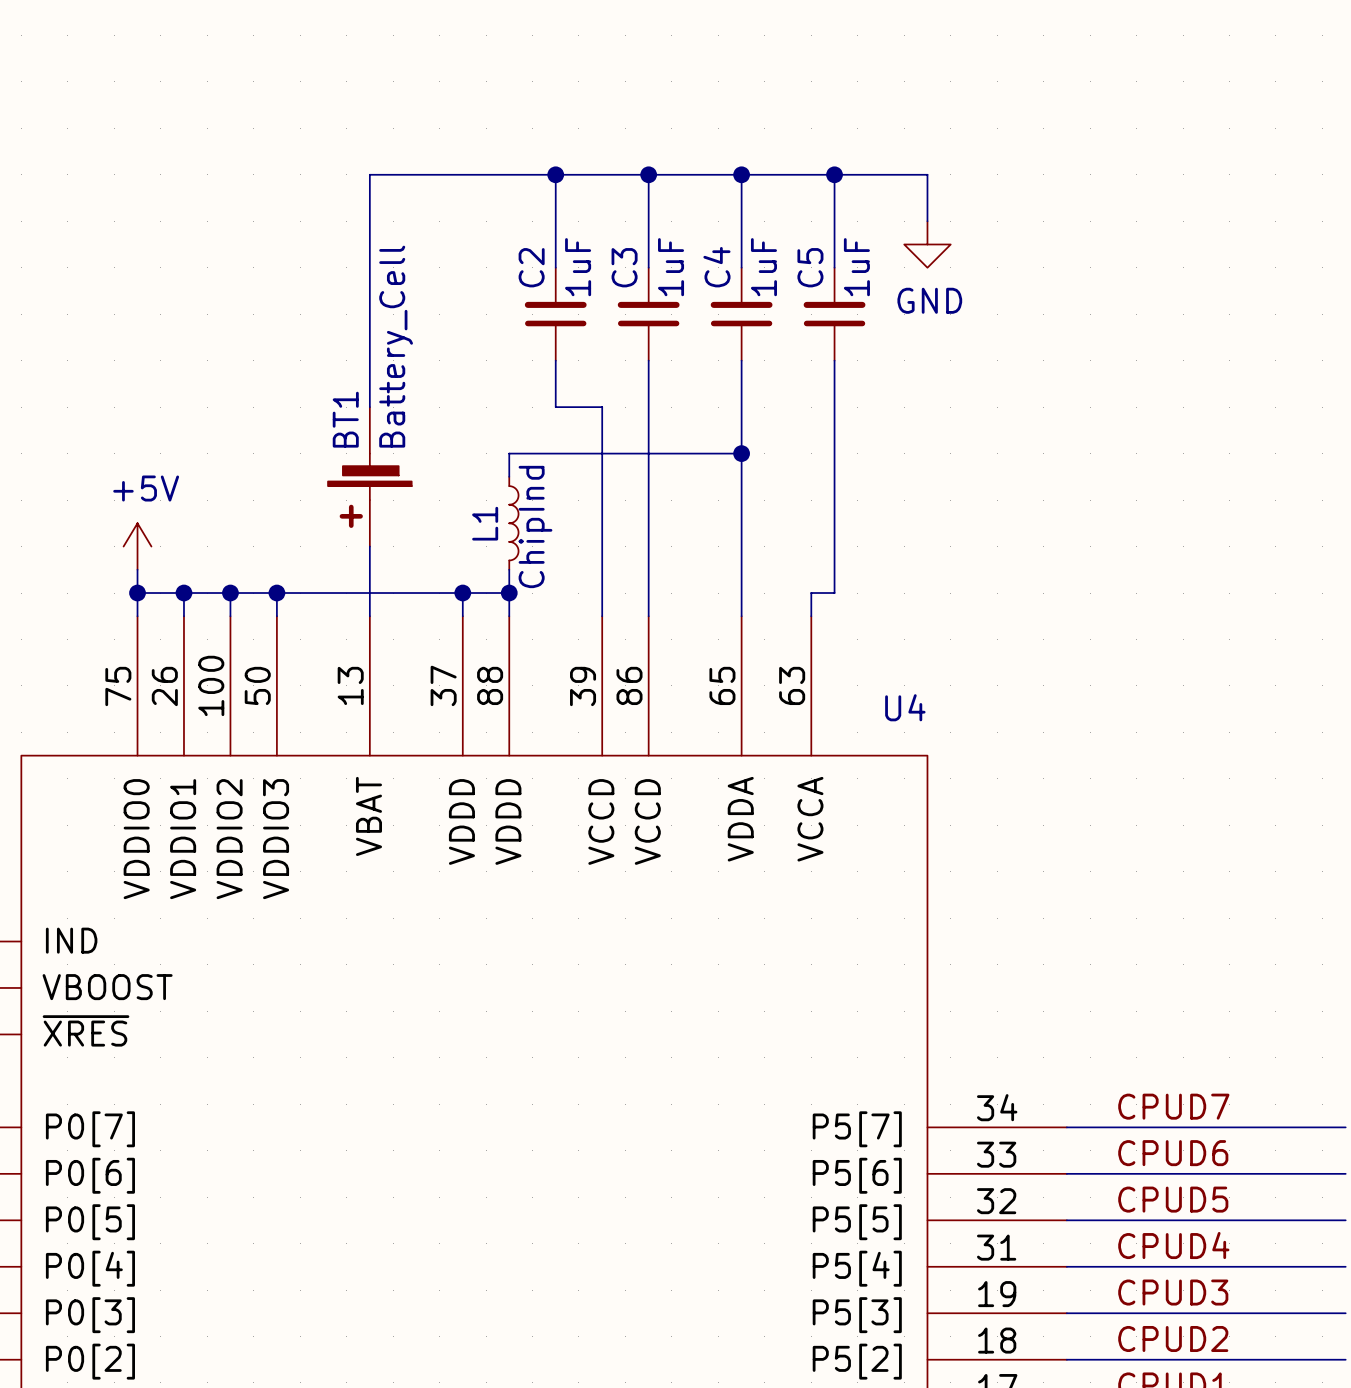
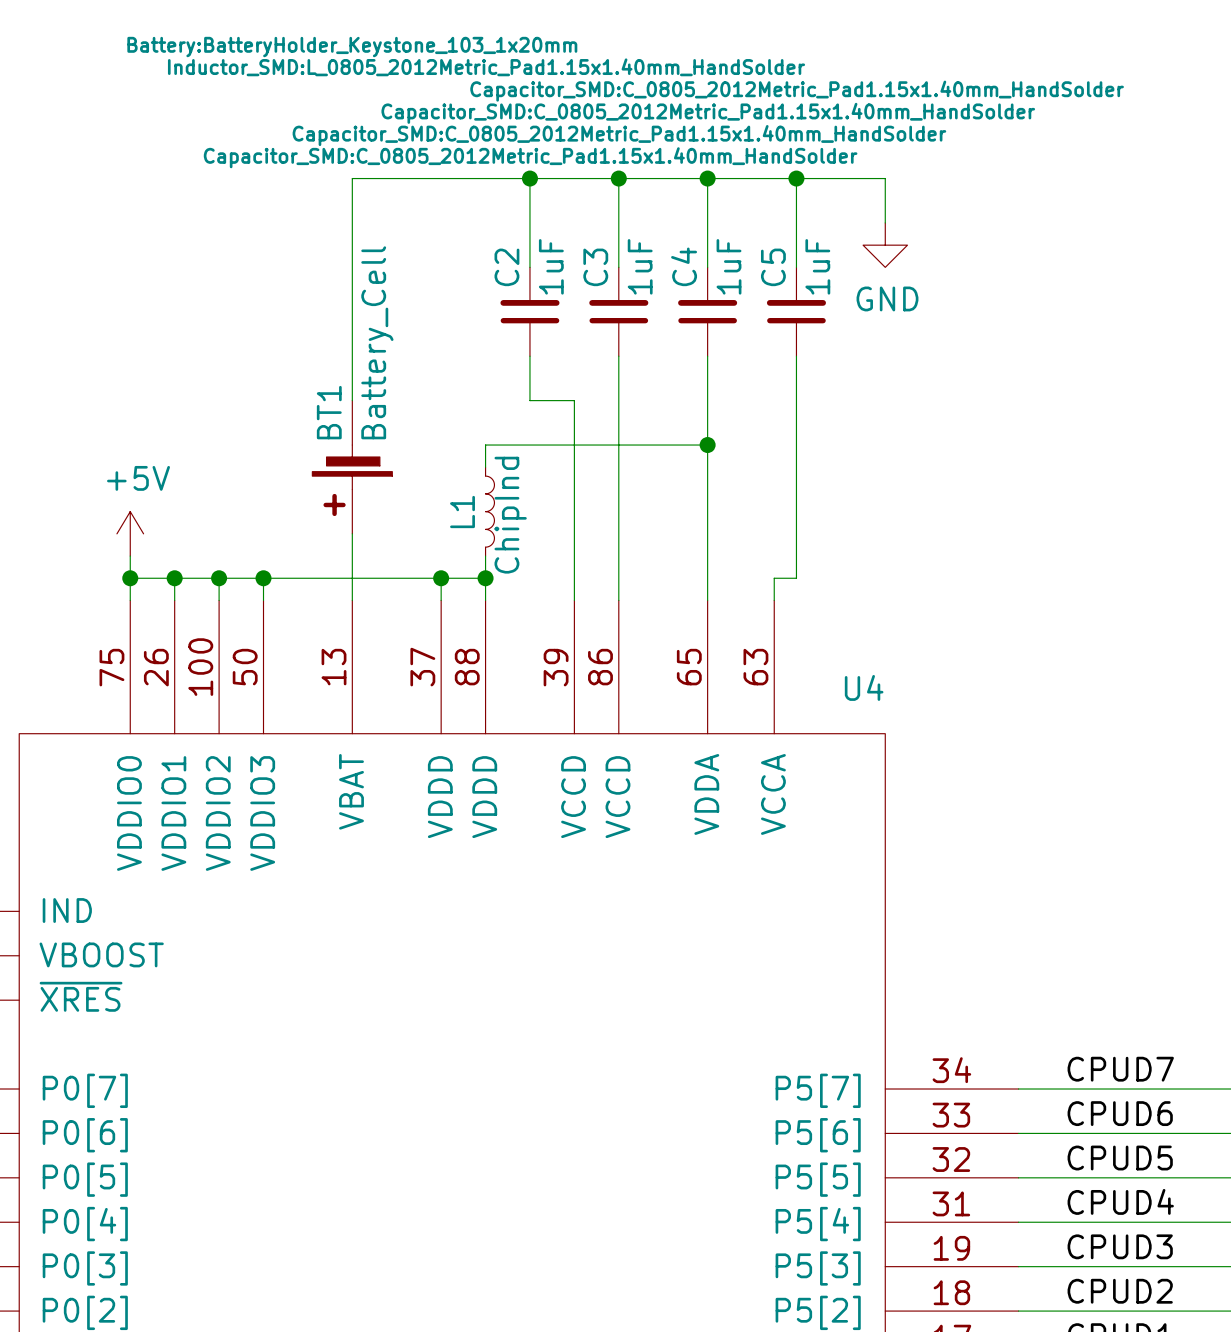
BT1 text: none -> Battery:BatteryHolder_Keystone_103_1x20mm (352, 47)
L1 text: none -> Inductor_SMD:L_0805_2012Metric_Pad1.15x1.40mm_HandSolder (486, 67)
C5 text: none -> Capacitor_SMD:C_0805_2012Metric_Pad1.15x1.40mm_HandSolder (797, 91)
C4 text: none -> Capacitor_SMD:C_0805_2012Metric_Pad1.15x1.40mm_HandSolder (708, 113)
C3 text: none -> Capacitor_SMD:C_0805_2012Metric_Pad1.15x1.40mm_HandSolder (619, 135)
C2 text: none -> Capacitor_SMD:C_0805_2012Metric_Pad1.15x1.40mm_HandSolder (530, 157)

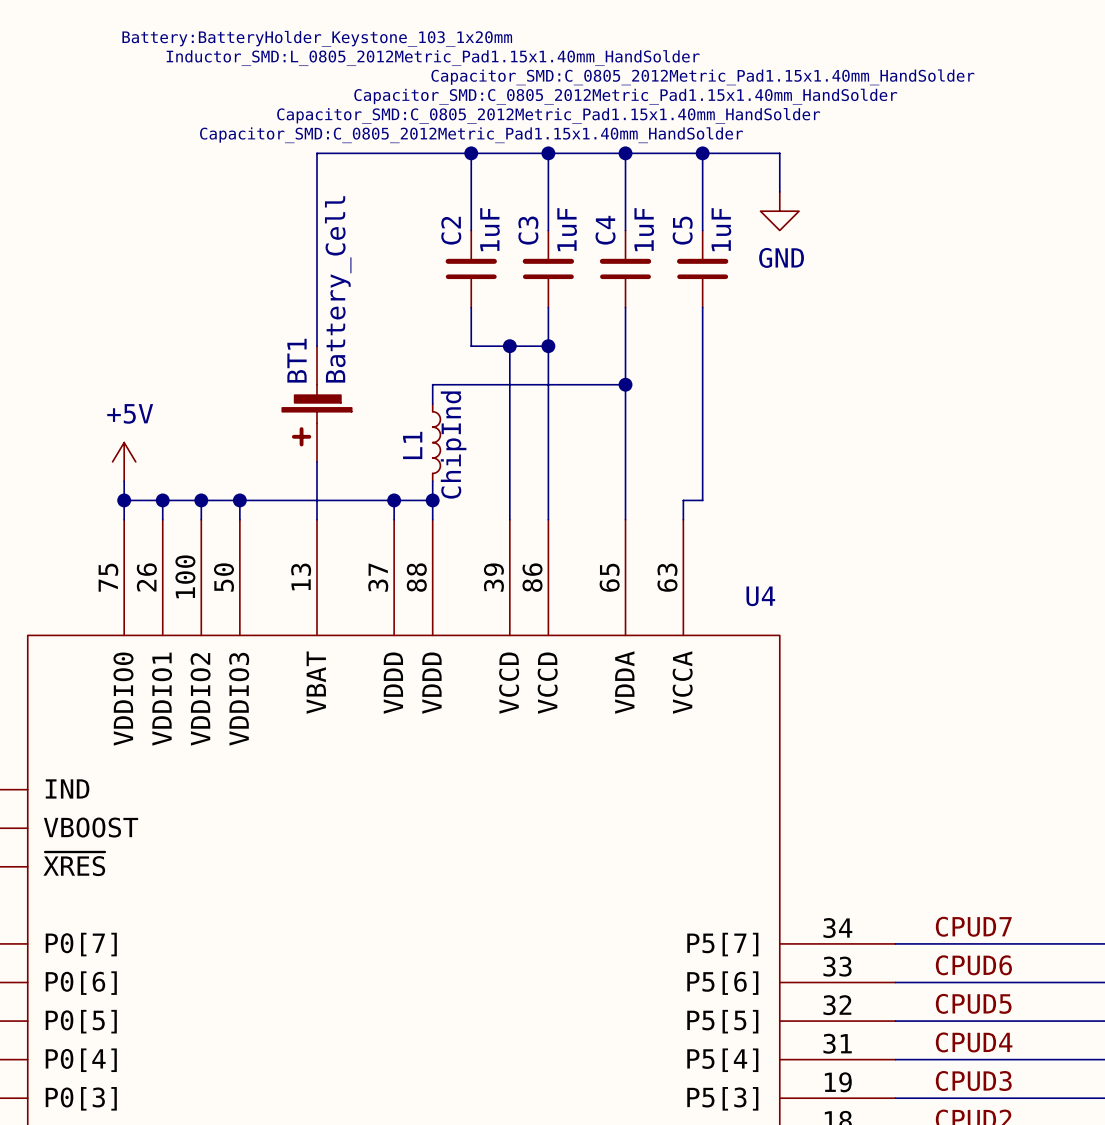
wire: none -> (509, 346) (548, 346)
junction: none -> (509, 346)
junction: none -> (548, 346)

